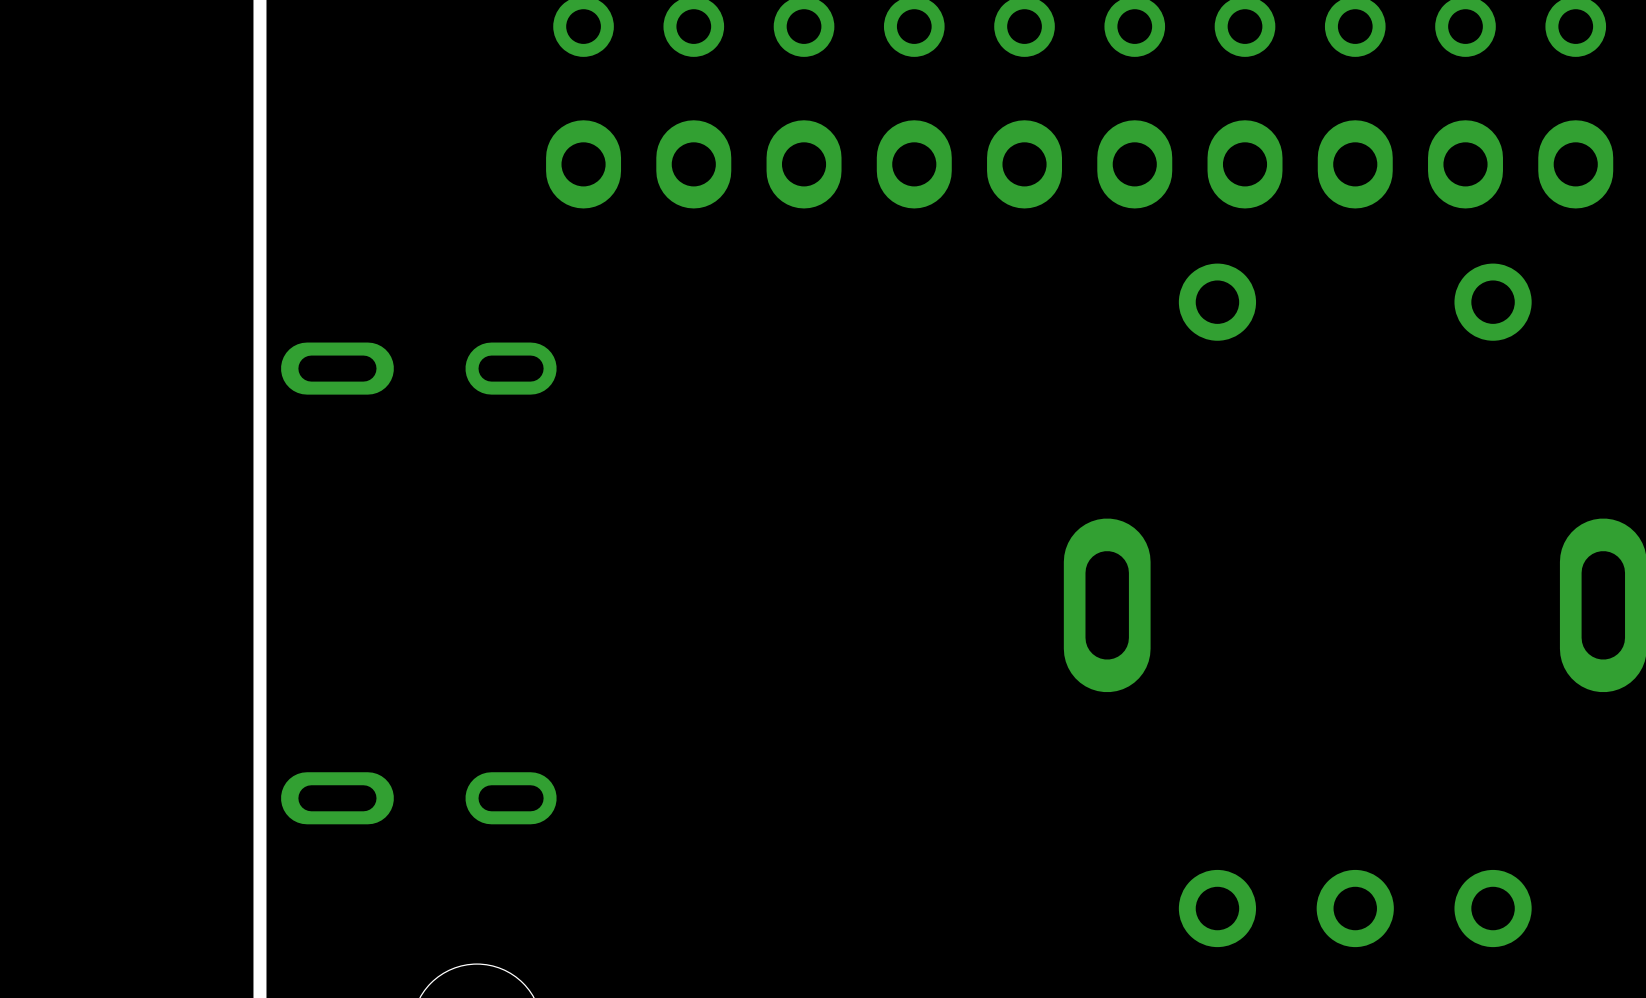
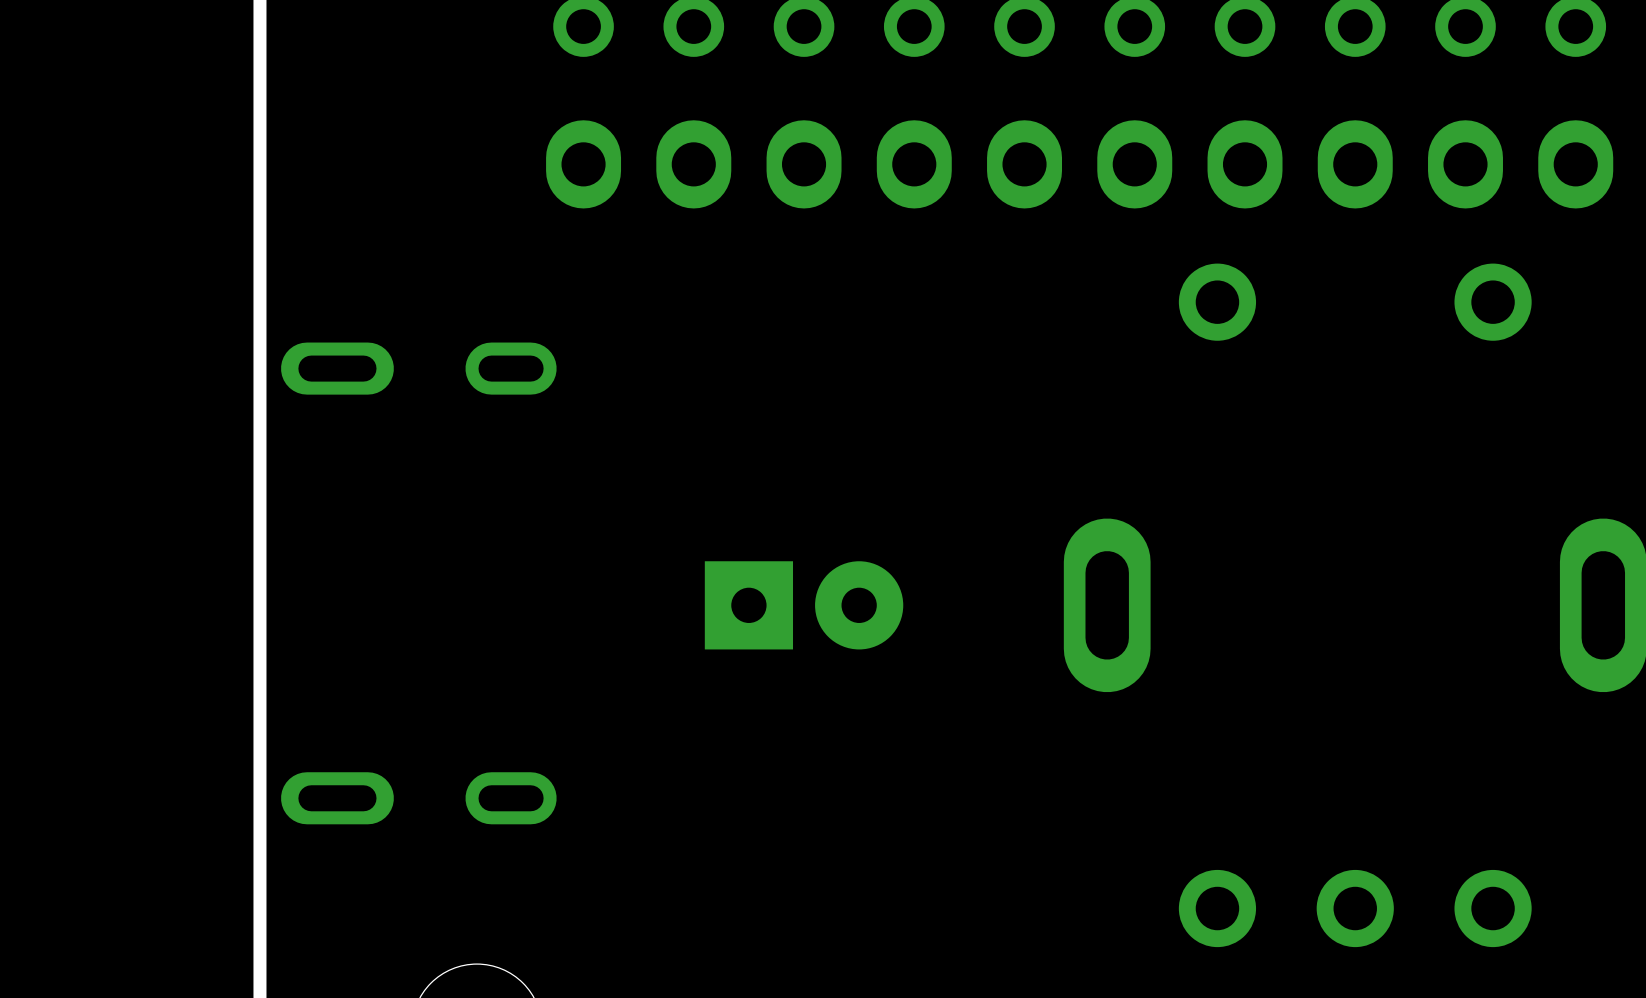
part: none -> (804, 605)

